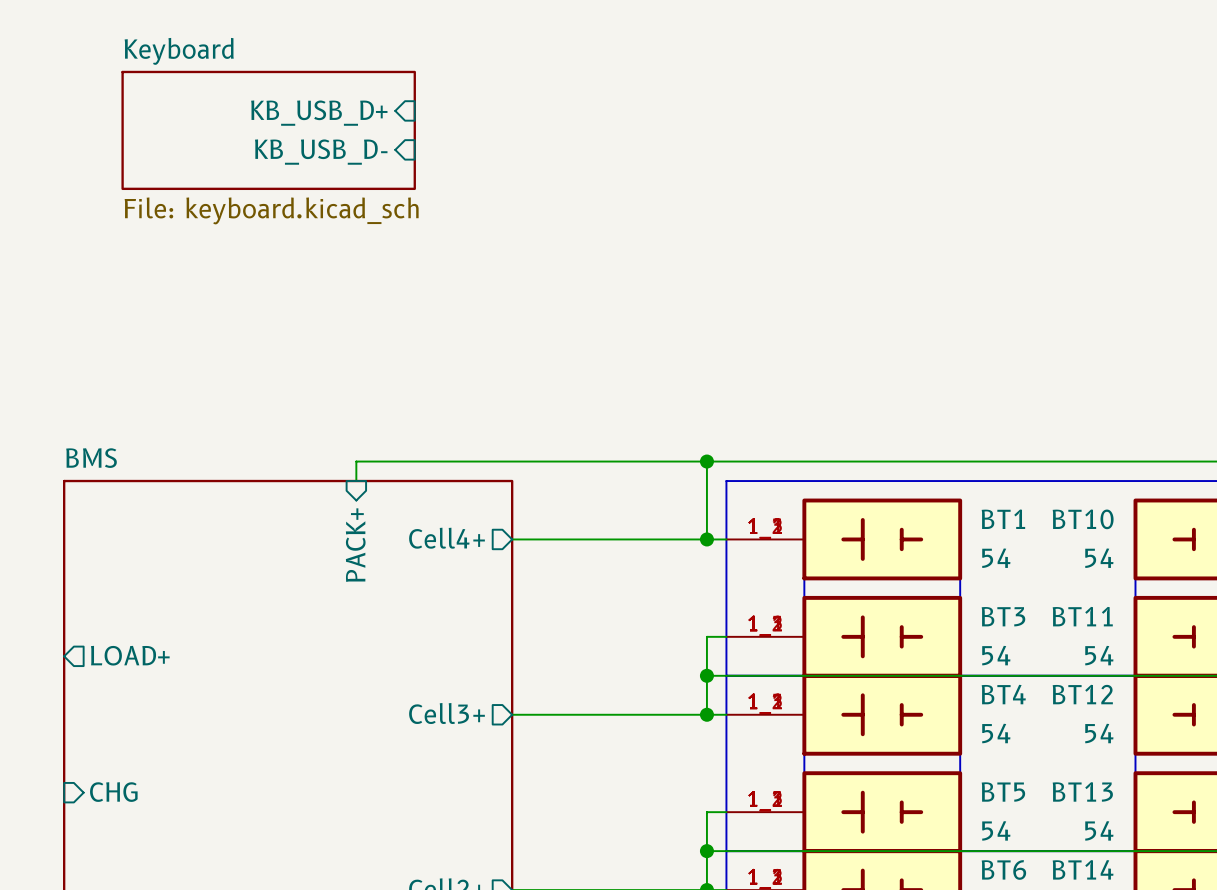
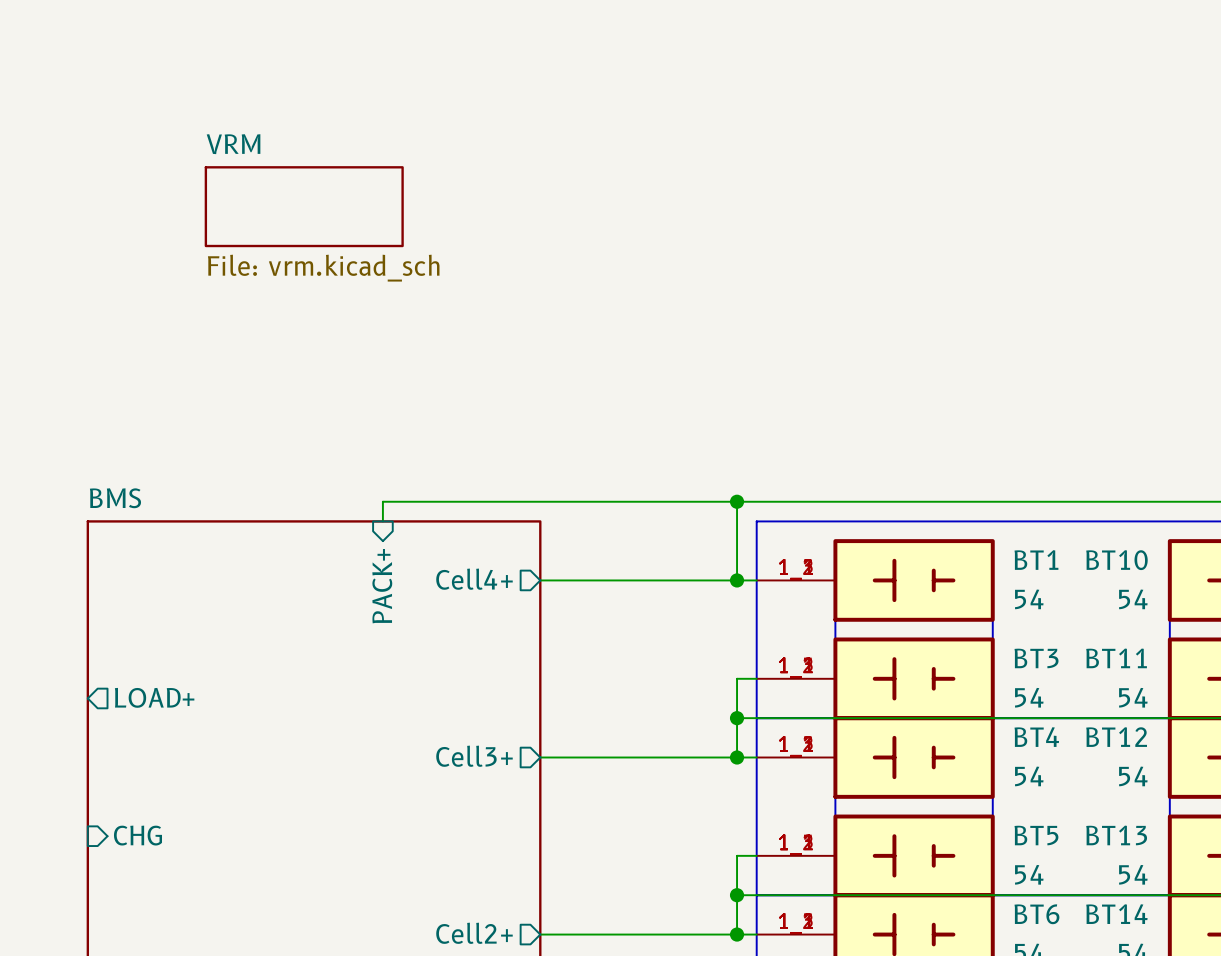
sheet pin: KB_USB_D+ (319, 113) -> none
sheet Keyboard: File: keyboard.kicad_sch (268, 130) -> none
sheet pin: KB_USB_D- (321, 152) -> none
sheet VRM: none -> File: vrm.kicad_sch (304, 206)

